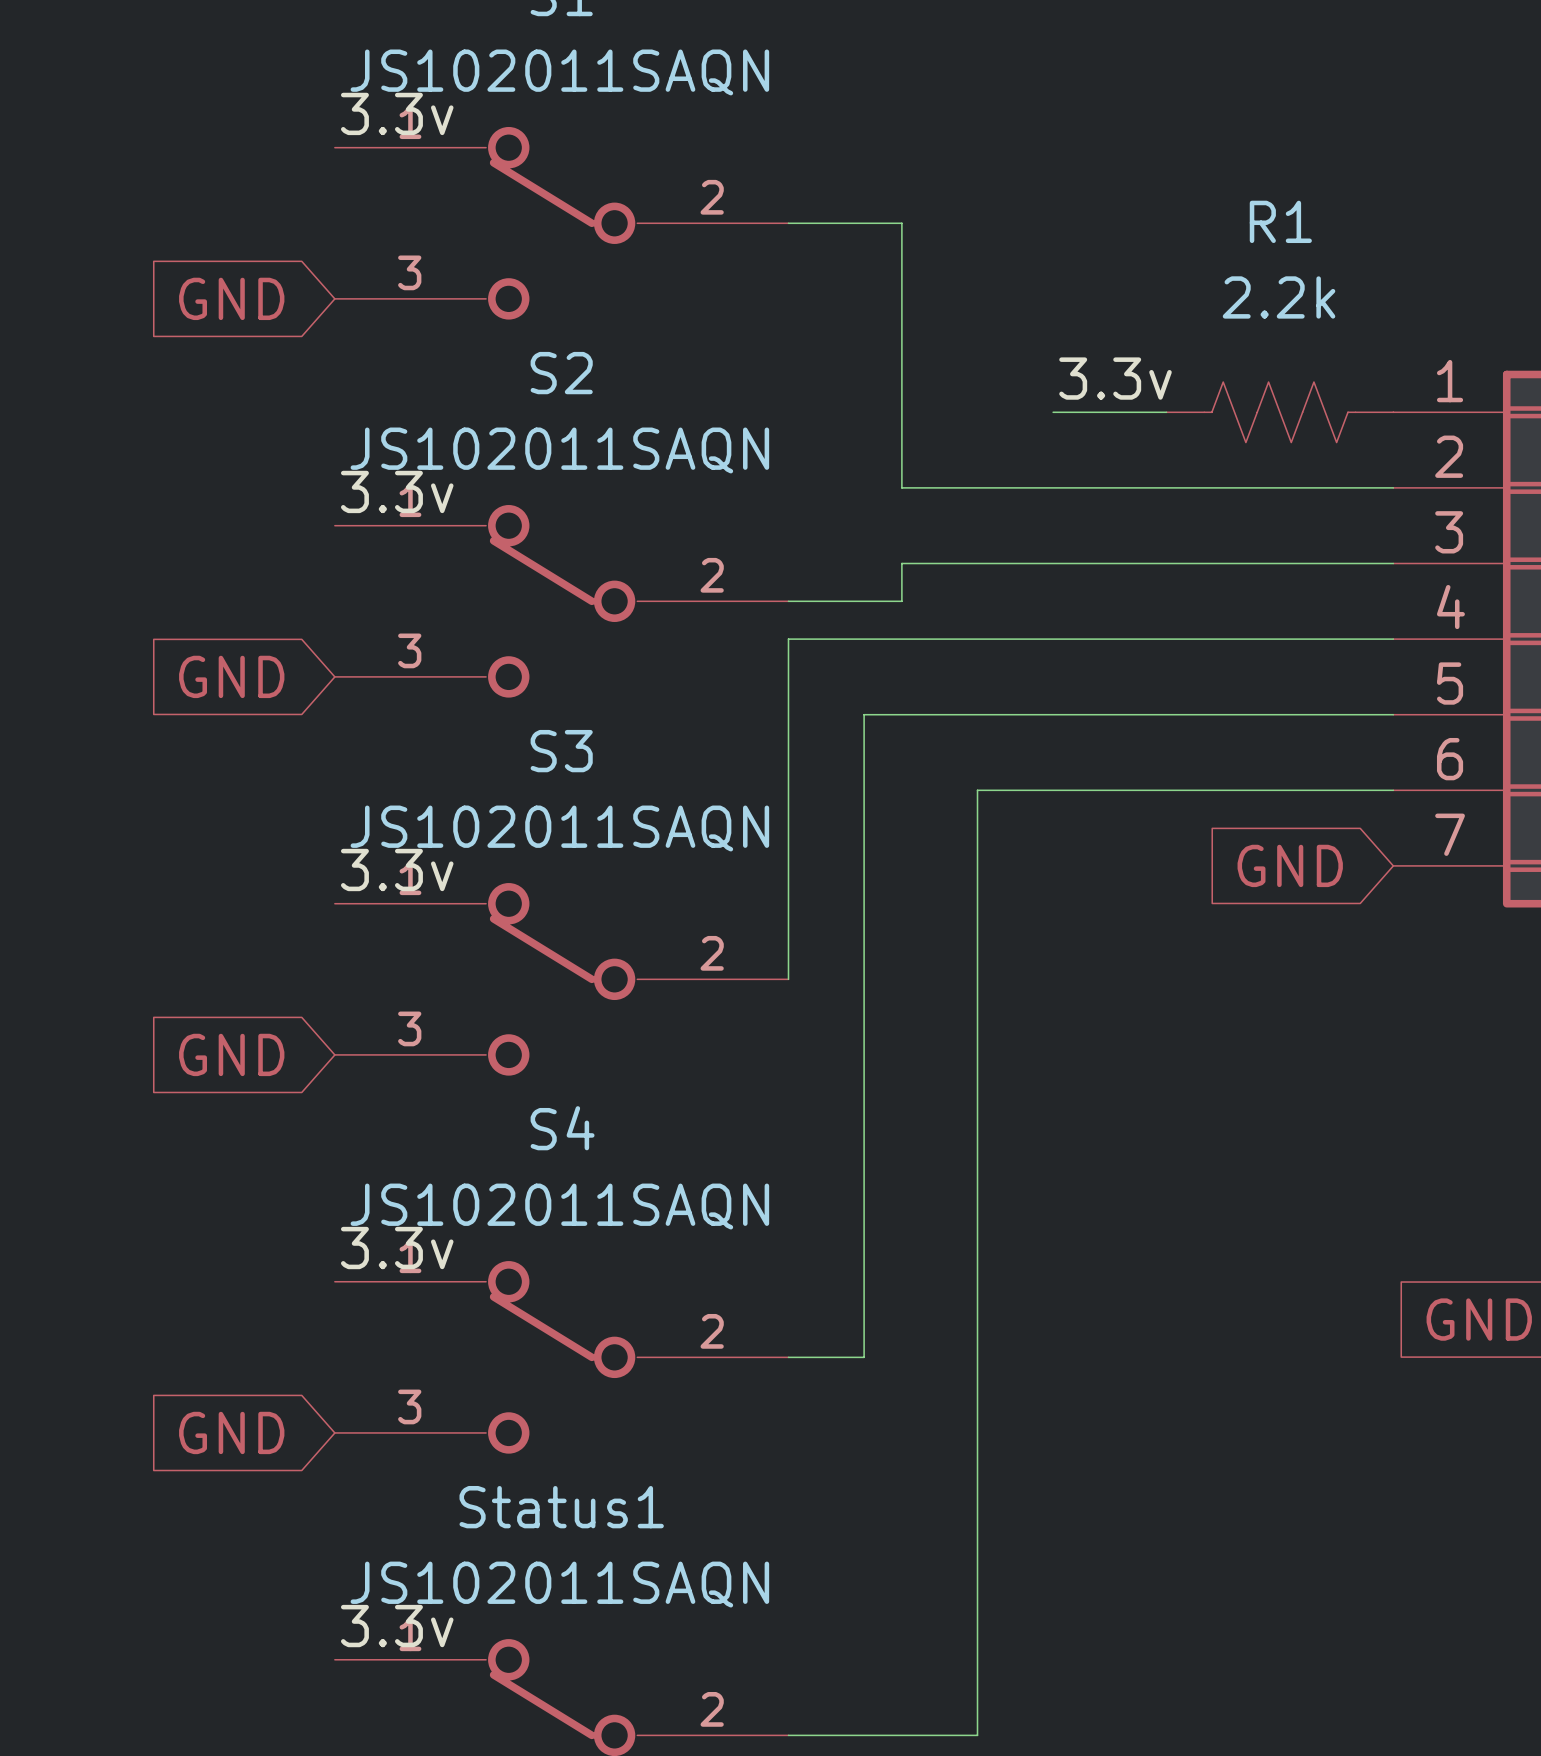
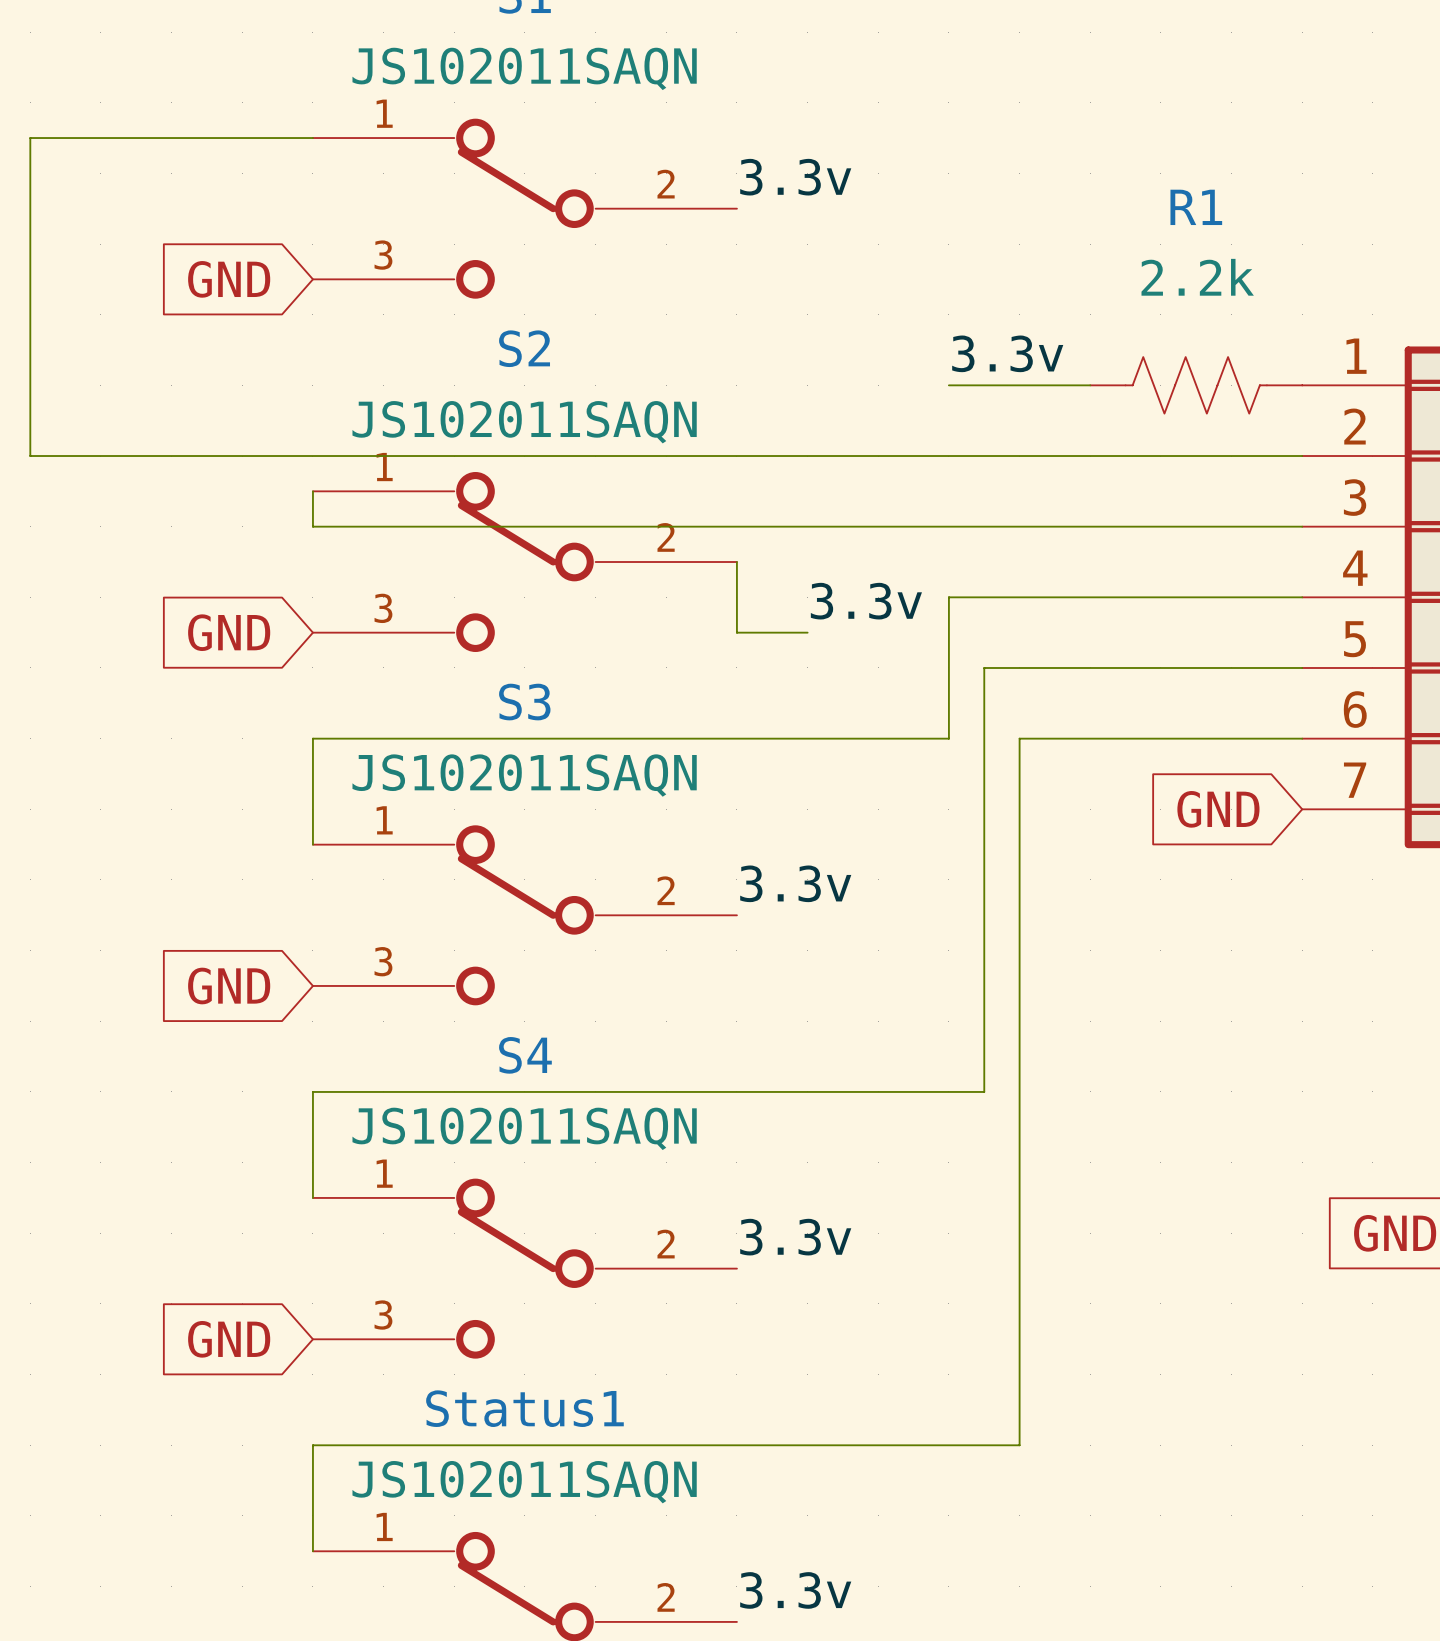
label: 3.3v (397, 113) -> none
label: none -> 3.3v (795, 177)
wire: (788, 223) (901, 223) (901, 487) -> (312, 138) (30, 138) (30, 456) (842, 456)
label position: 3.3v (1115, 378) -> 3.3v (1007, 353)
wire: none -> (948, 385) (984, 385)
label: 3.3v (397, 491) -> none
wire: none -> (312, 491) (312, 526) (842, 526)
wire: (901, 563) (901, 601) (788, 601) -> (736, 597) (736, 562)
wire: (788, 639) (1015, 639) -> none
label: none -> 3.3v (866, 601)
wire: (788, 676) (788, 979) -> (736, 632) (807, 632)
wire: (1053, 714) (864, 714) (864, 1357) (788, 1357) -> (984, 667) (984, 1091) (312, 1091) (312, 1197)
wire: (977, 790) (977, 1735) (788, 1735) -> (913, 738) (312, 738) (312, 844)
wire: (1015, 790) (1090, 790) -> (948, 738) (948, 597)
wire: none -> (1019, 738) (1019, 1445) (312, 1445) (312, 1551)
label: 3.3v (397, 869) -> none
label: none -> 3.3v (795, 883)
label: 3.3v (397, 1248) -> none
label: none -> 3.3v (795, 1237)
label: 3.3v (397, 1626) -> none
label: none -> 3.3v (795, 1590)

